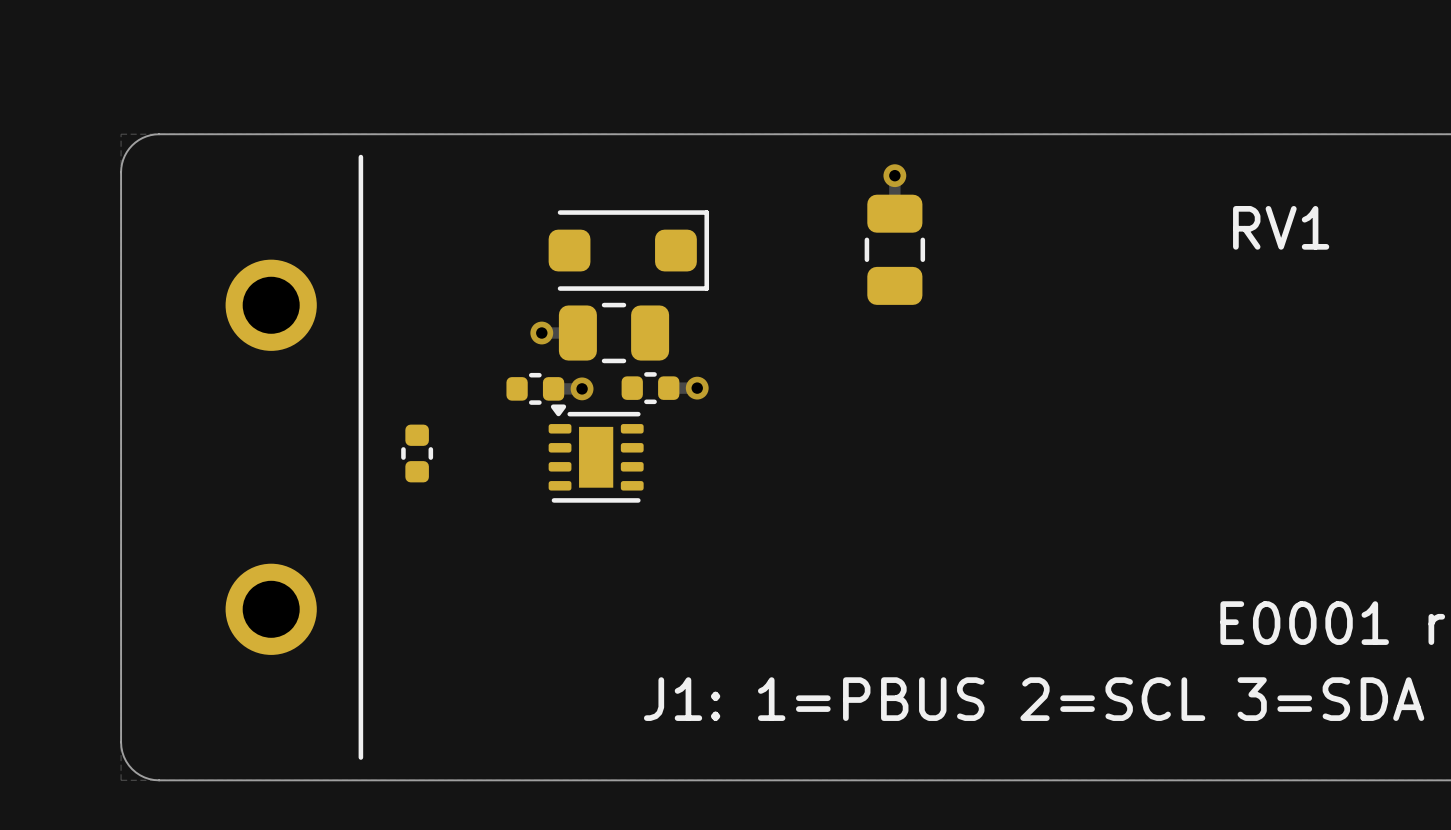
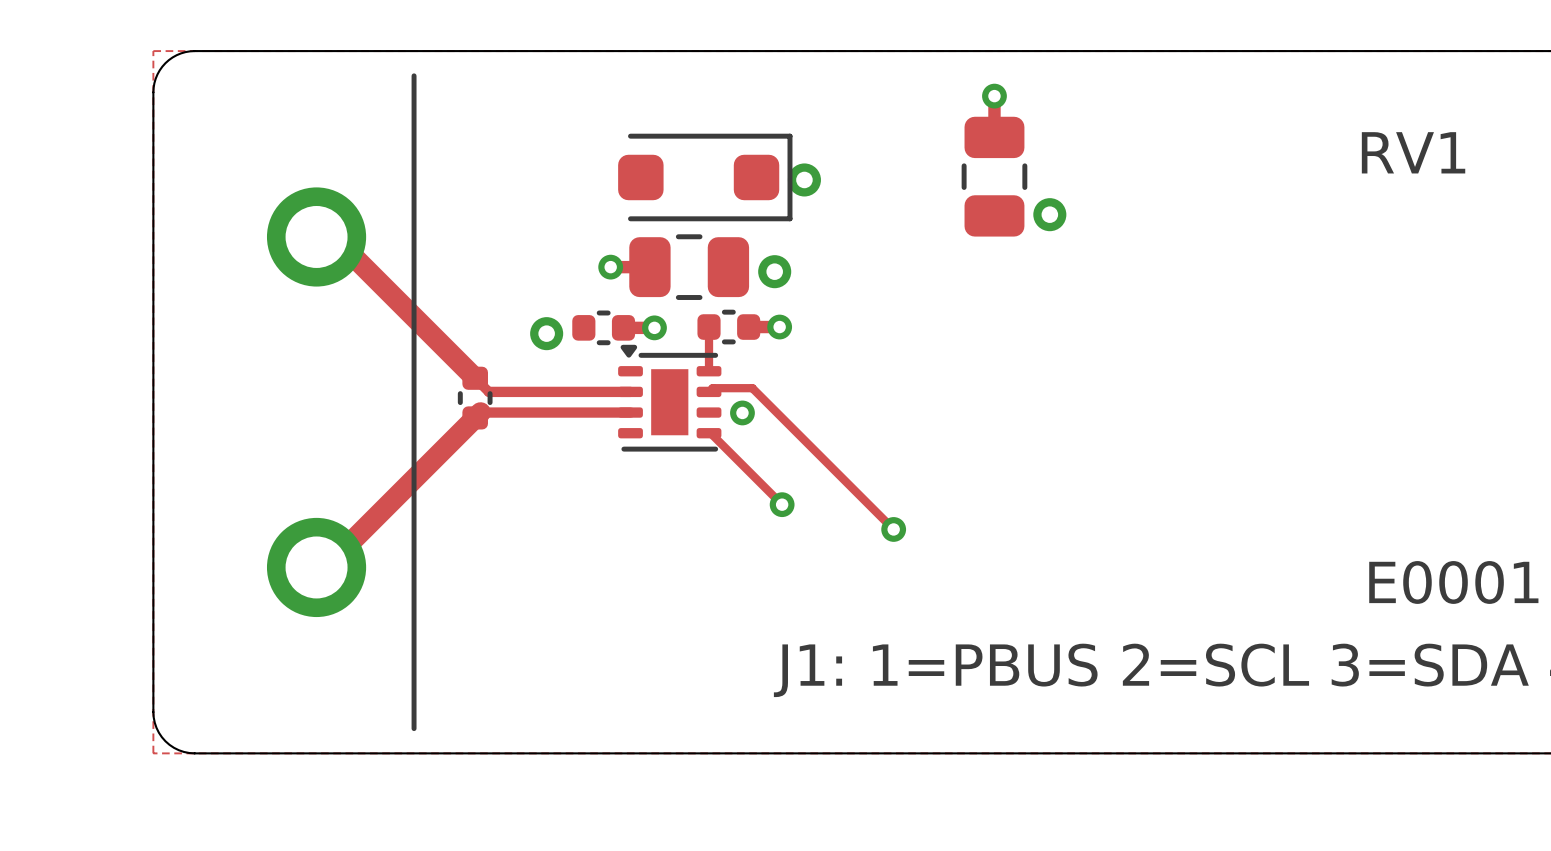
via: none -> (804, 179)
via: none -> (1049, 214)
track: none -> (316, 236) (333, 236) (488, 391) (630, 391)
via: none -> (774, 271)
track: none -> (709, 327) (709, 369)
via: none -> (546, 333)
track: none -> (709, 391) (712, 388) (752, 388) (893, 529)
track: none -> (630, 412) (480, 412) (325, 567) (316, 567)
via: none -> (742, 412)
track: none -> (709, 433) (782, 504)
via: none -> (782, 504)
via: none -> (893, 529)

